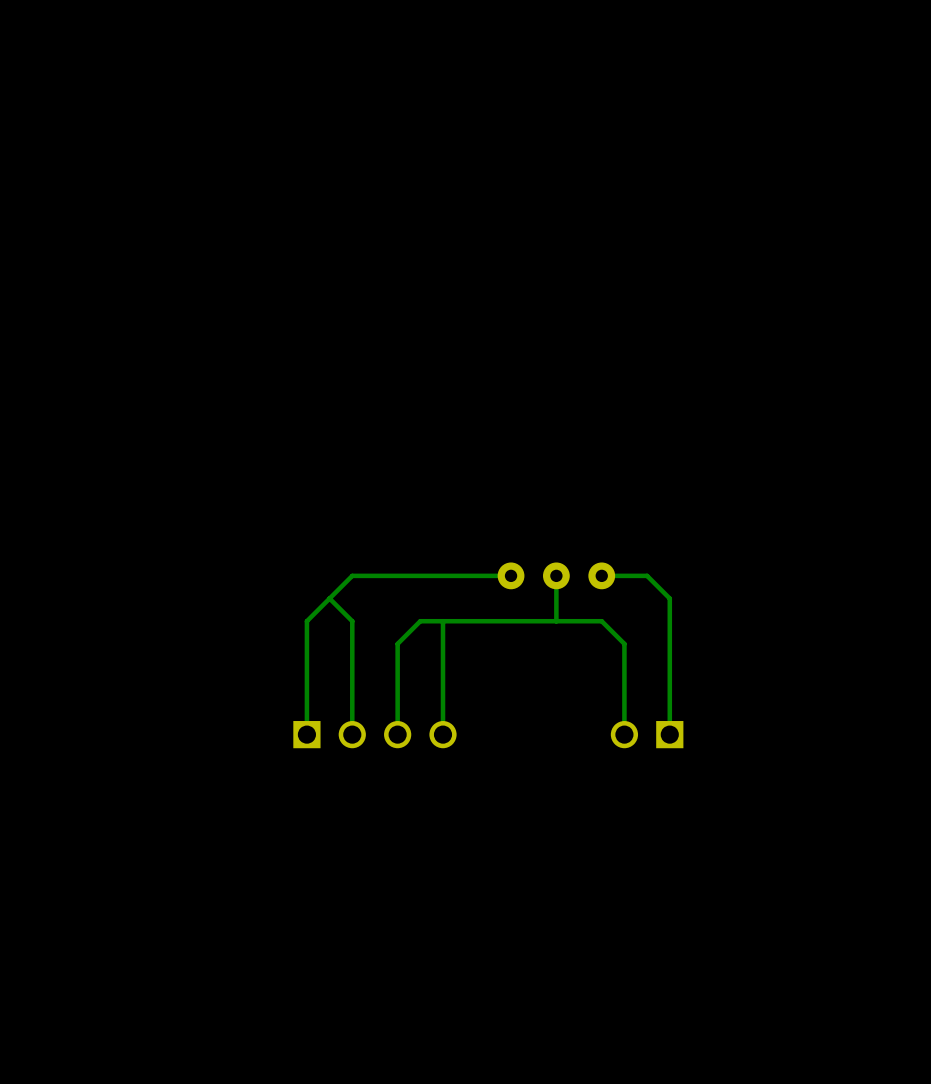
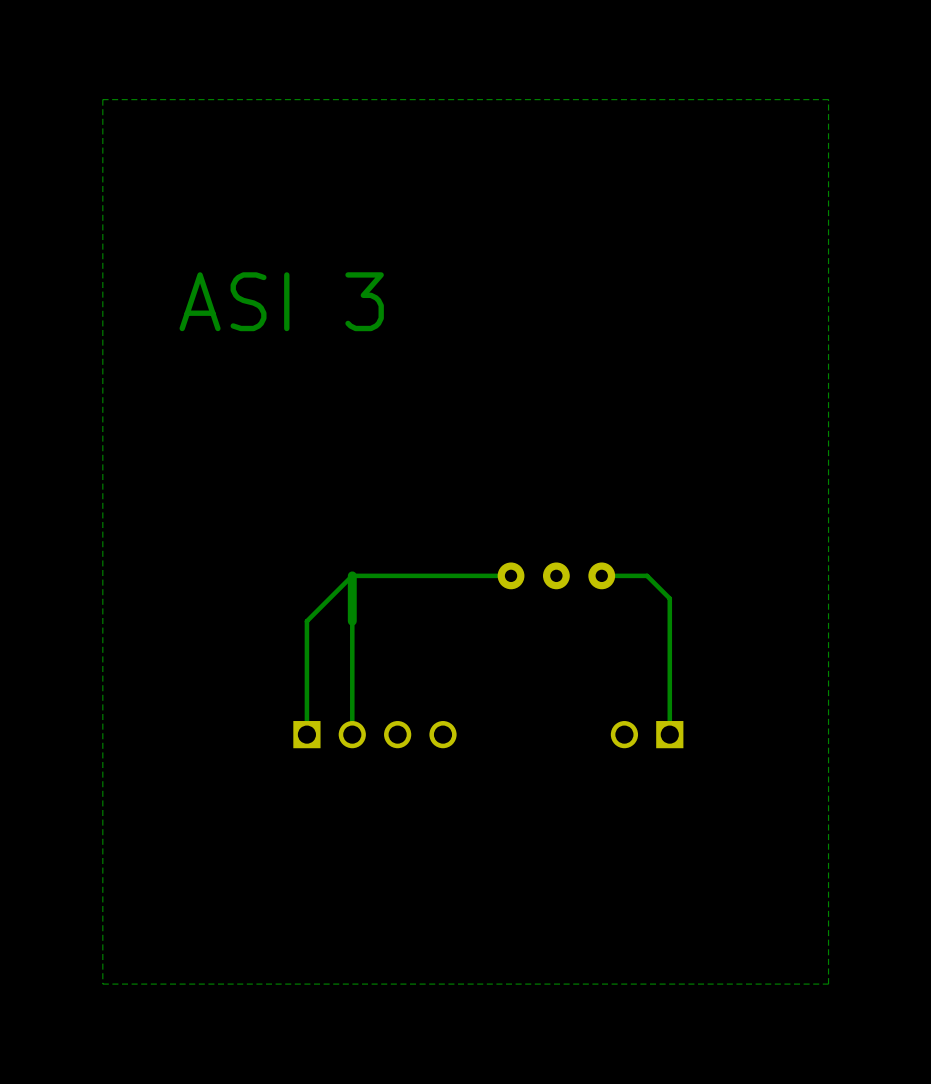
zone outline: none -> (828, 99) (828, 984) (102, 984) (102, 99) (828, 99)
text: none -> ASI 3 (281, 301)
track: (556, 575) (556, 621) -> none
track: (329, 598) (352, 621) -> (352, 575) (352, 621)
track: (443, 621) (443, 734) -> none
track: (624, 734) (624, 643) (601, 621) (420, 621) (397, 643) (397, 734) -> none

